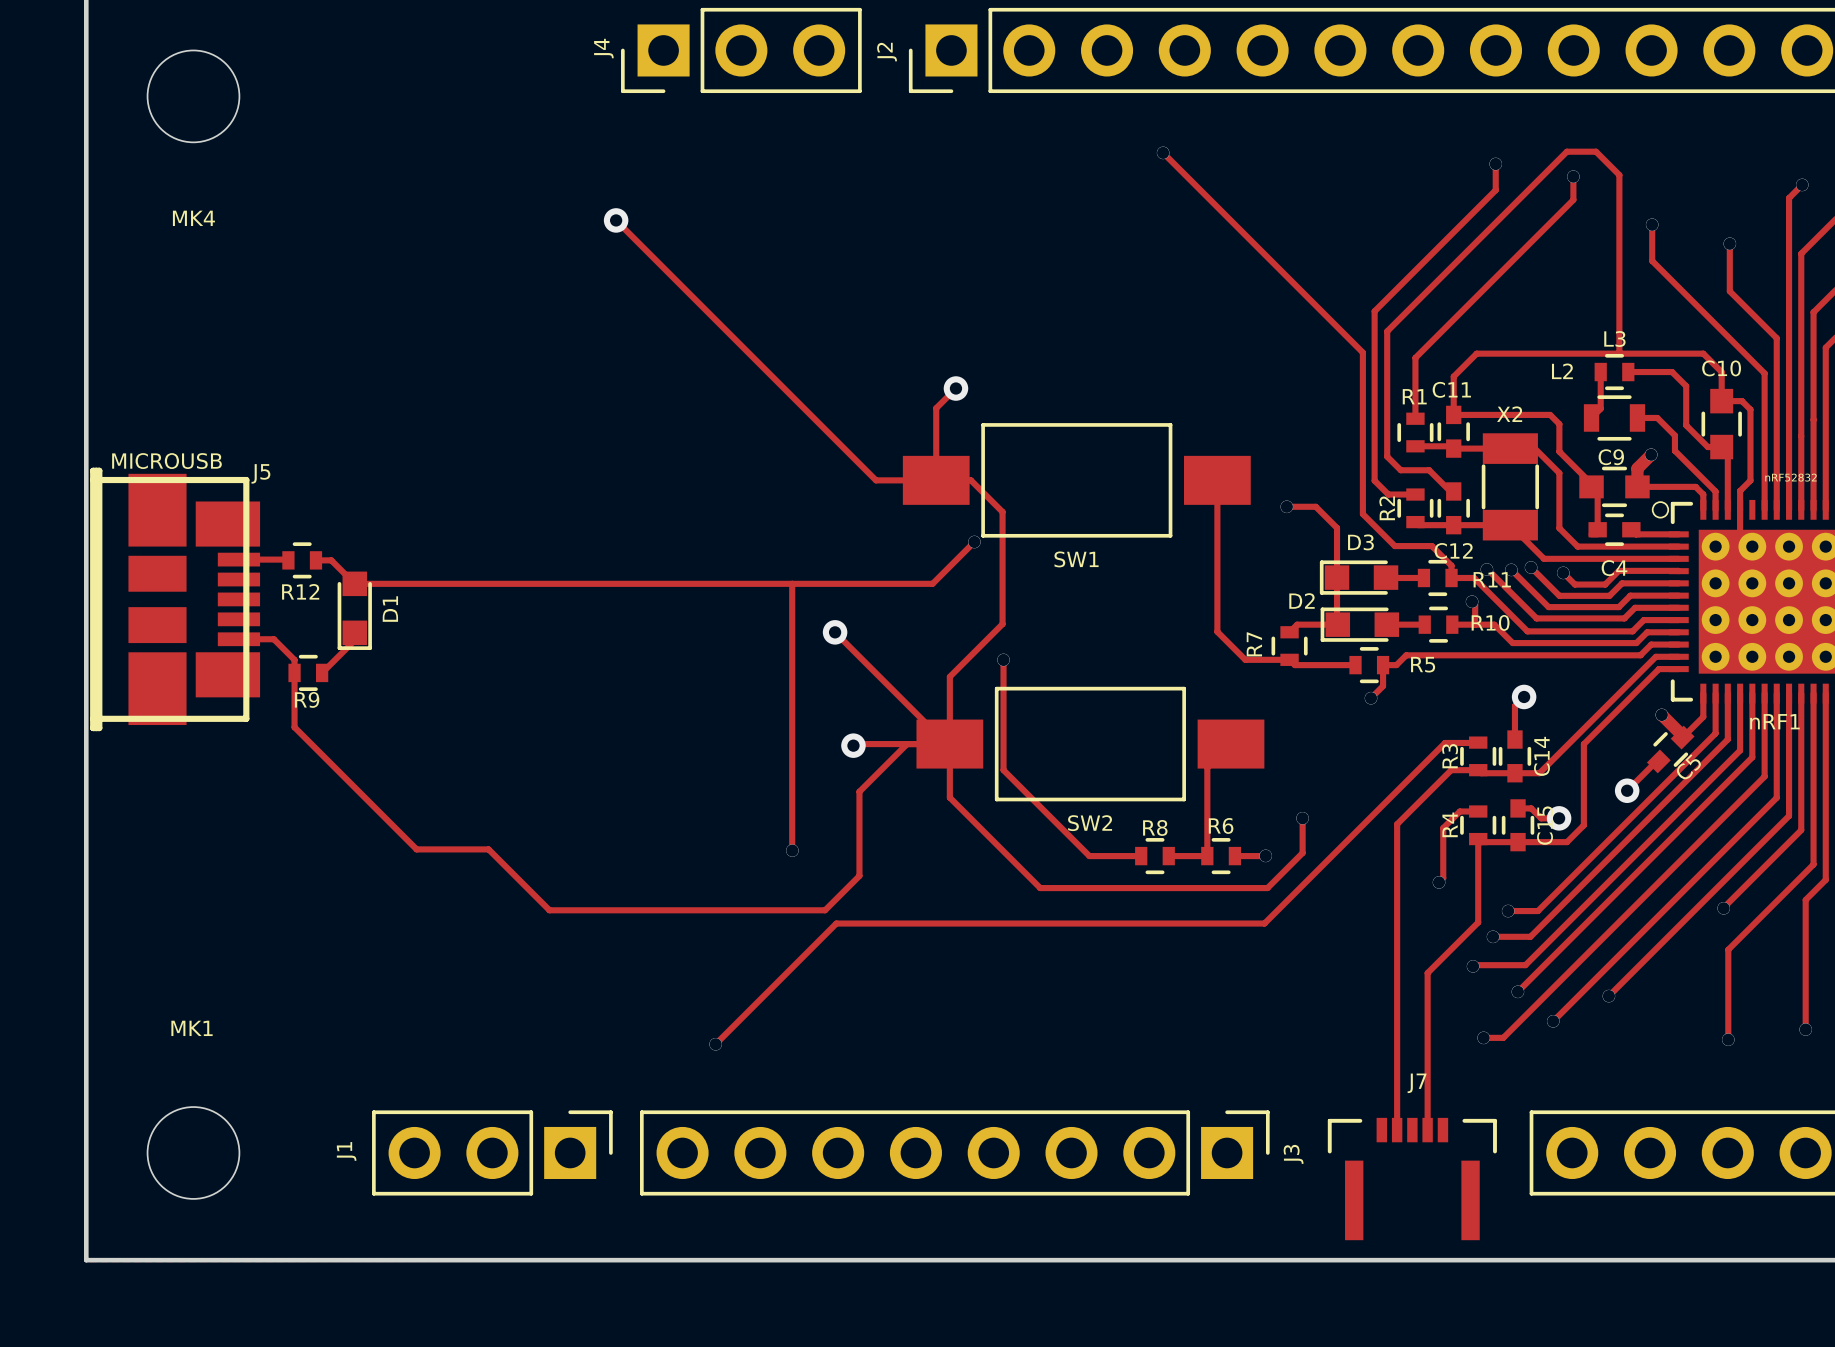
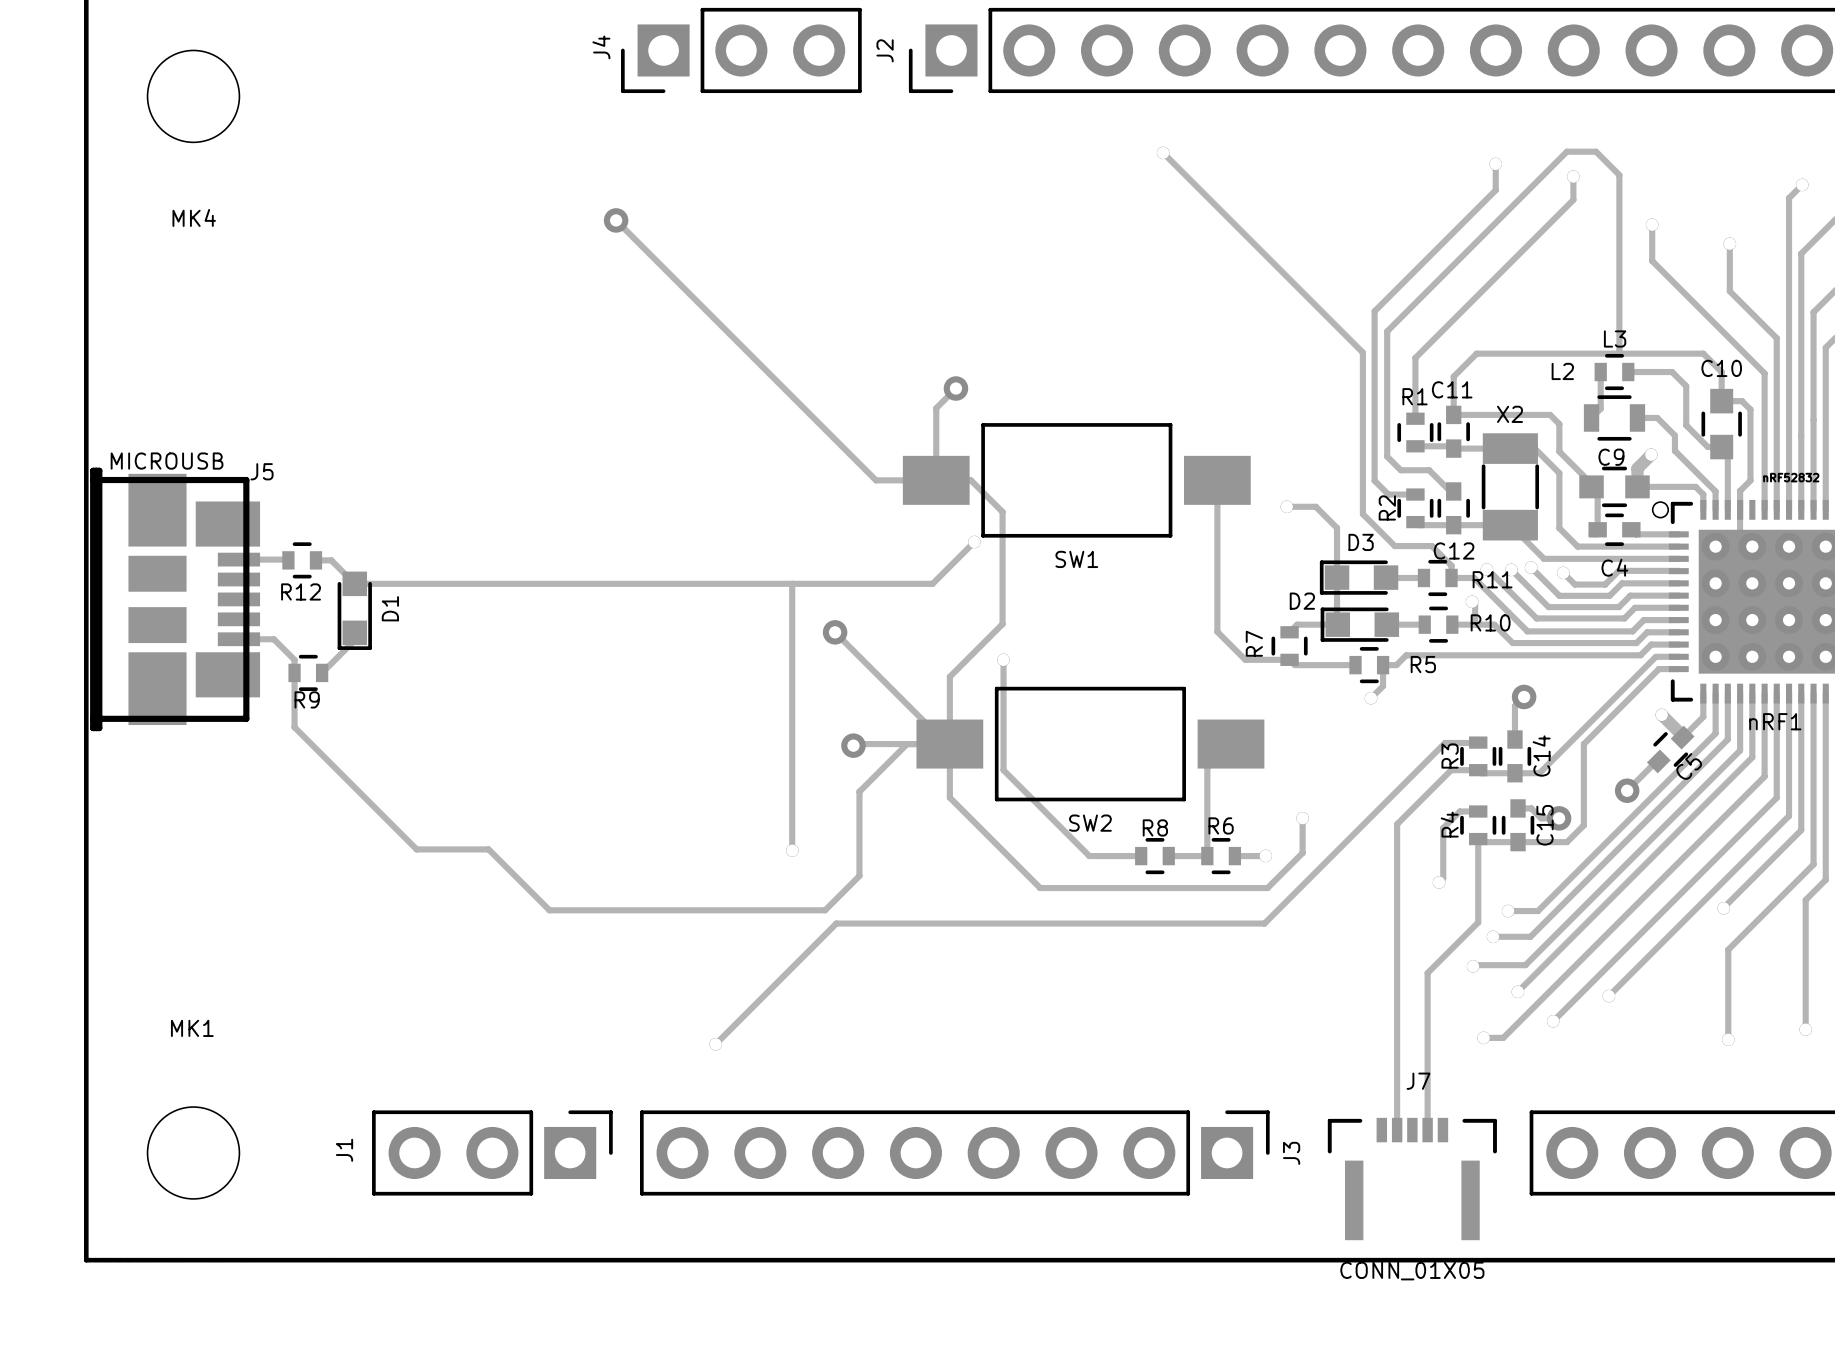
J7 value: none -> CONN_01X05 (1412, 1271)

